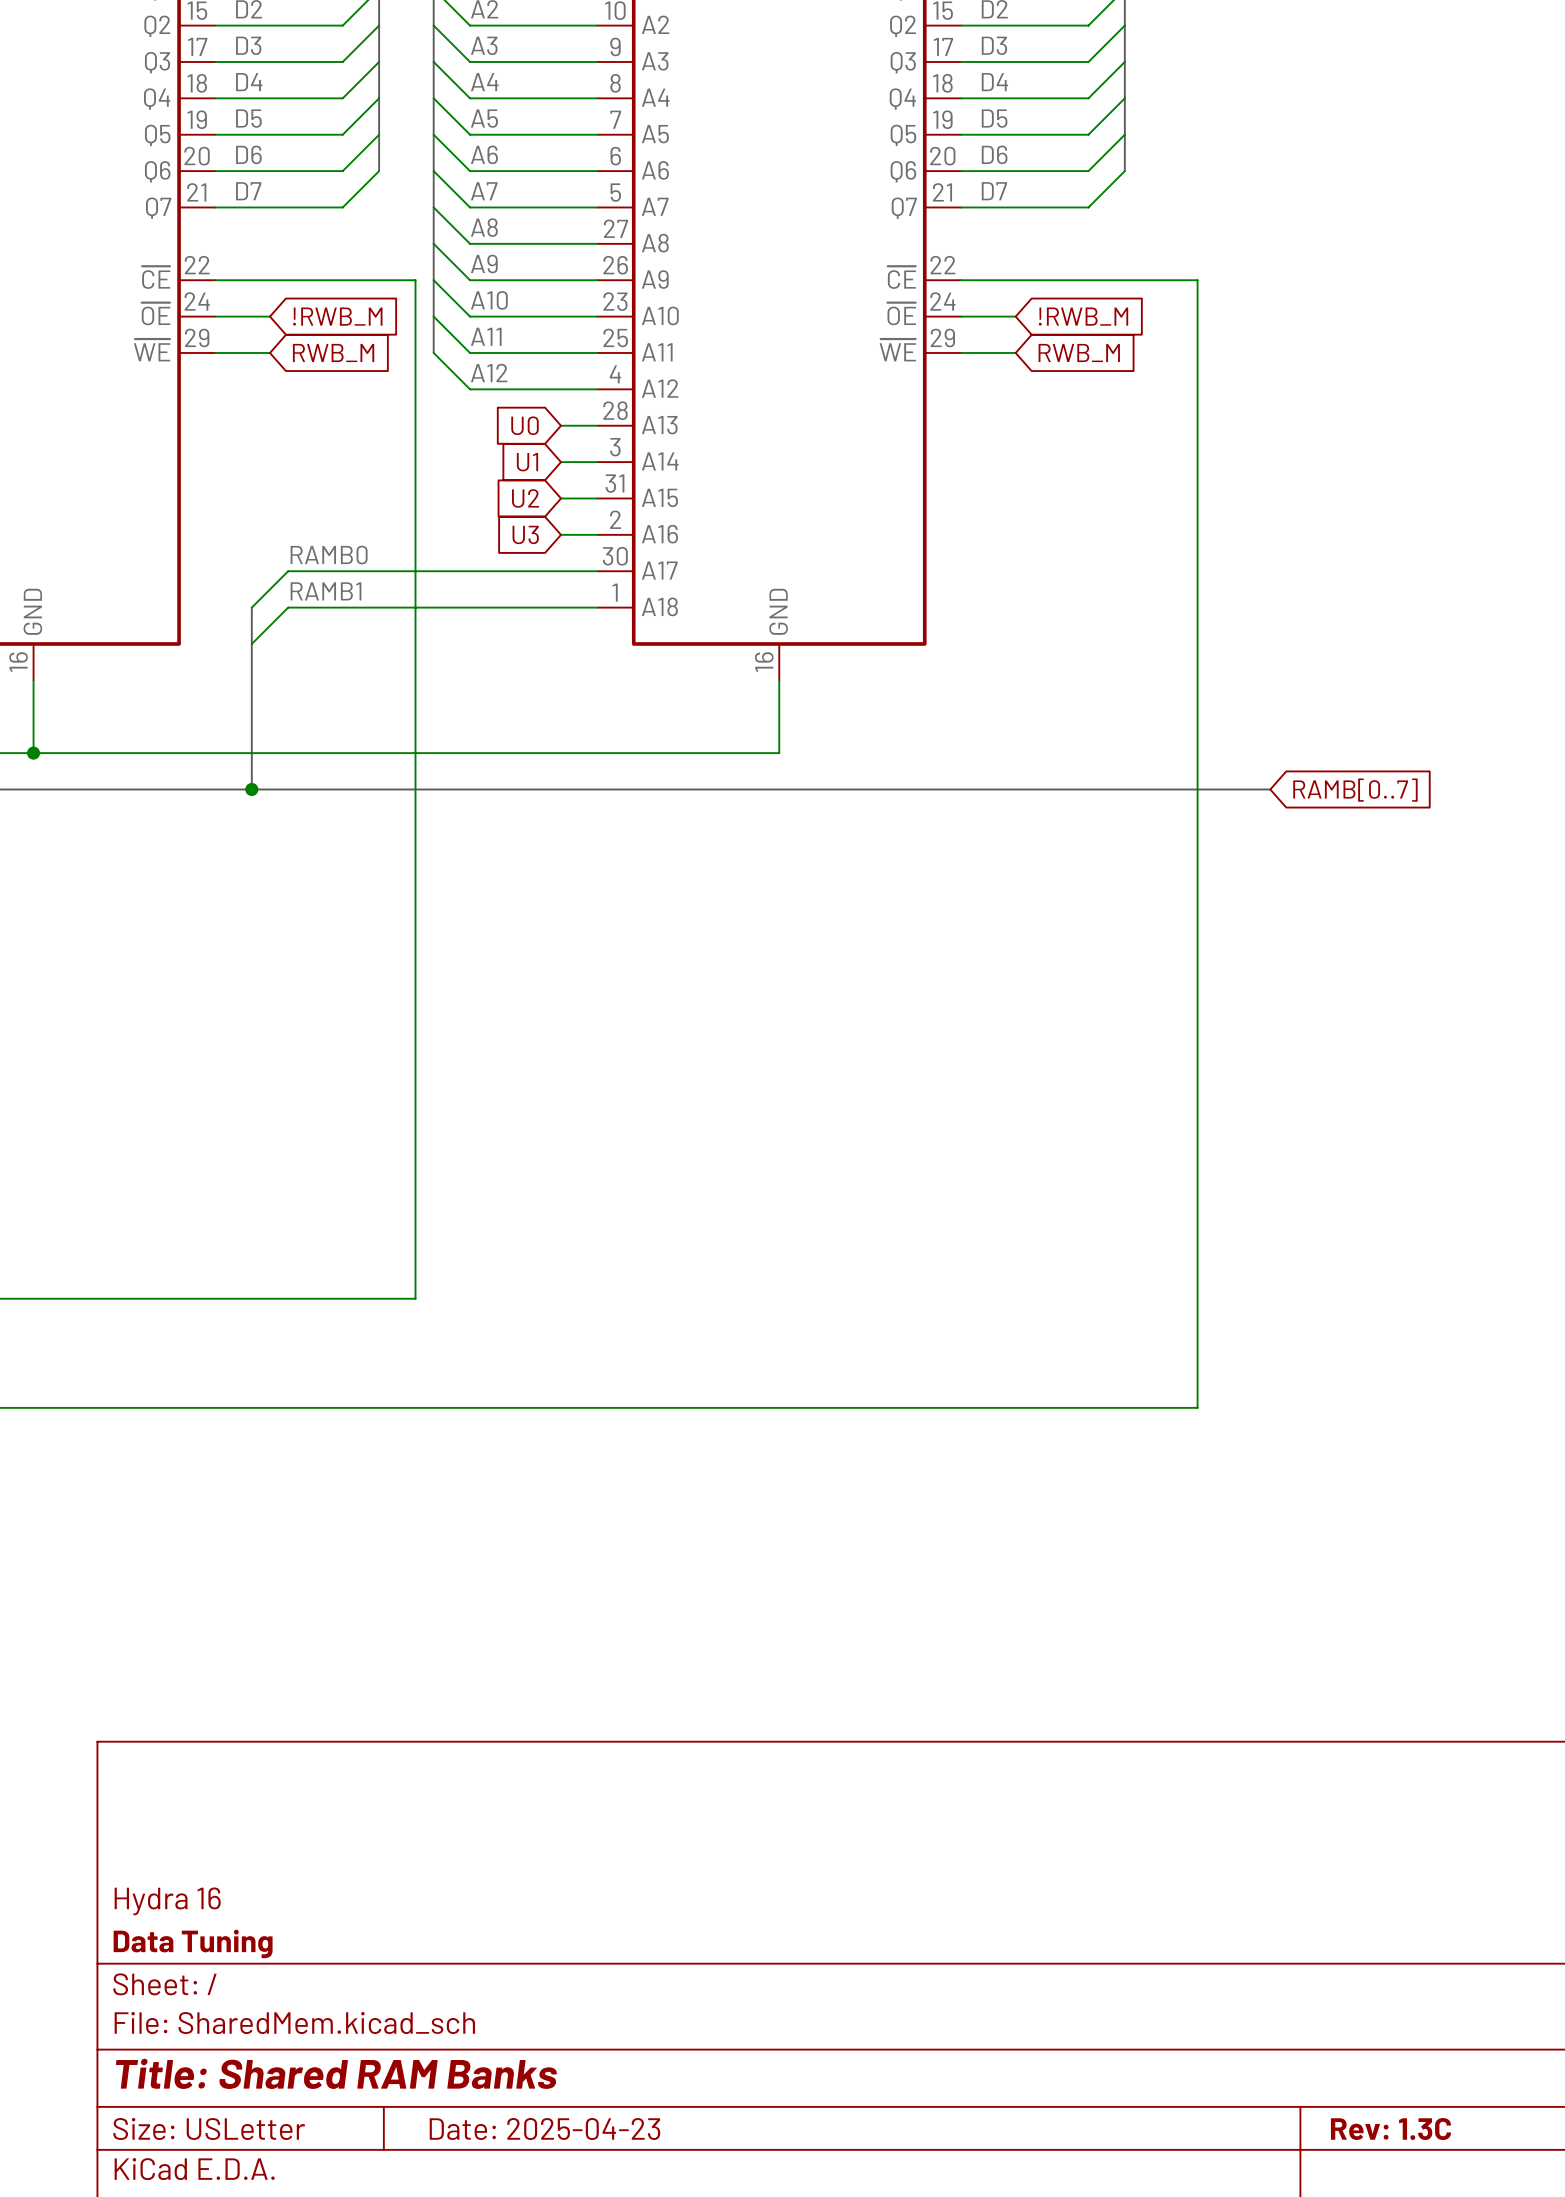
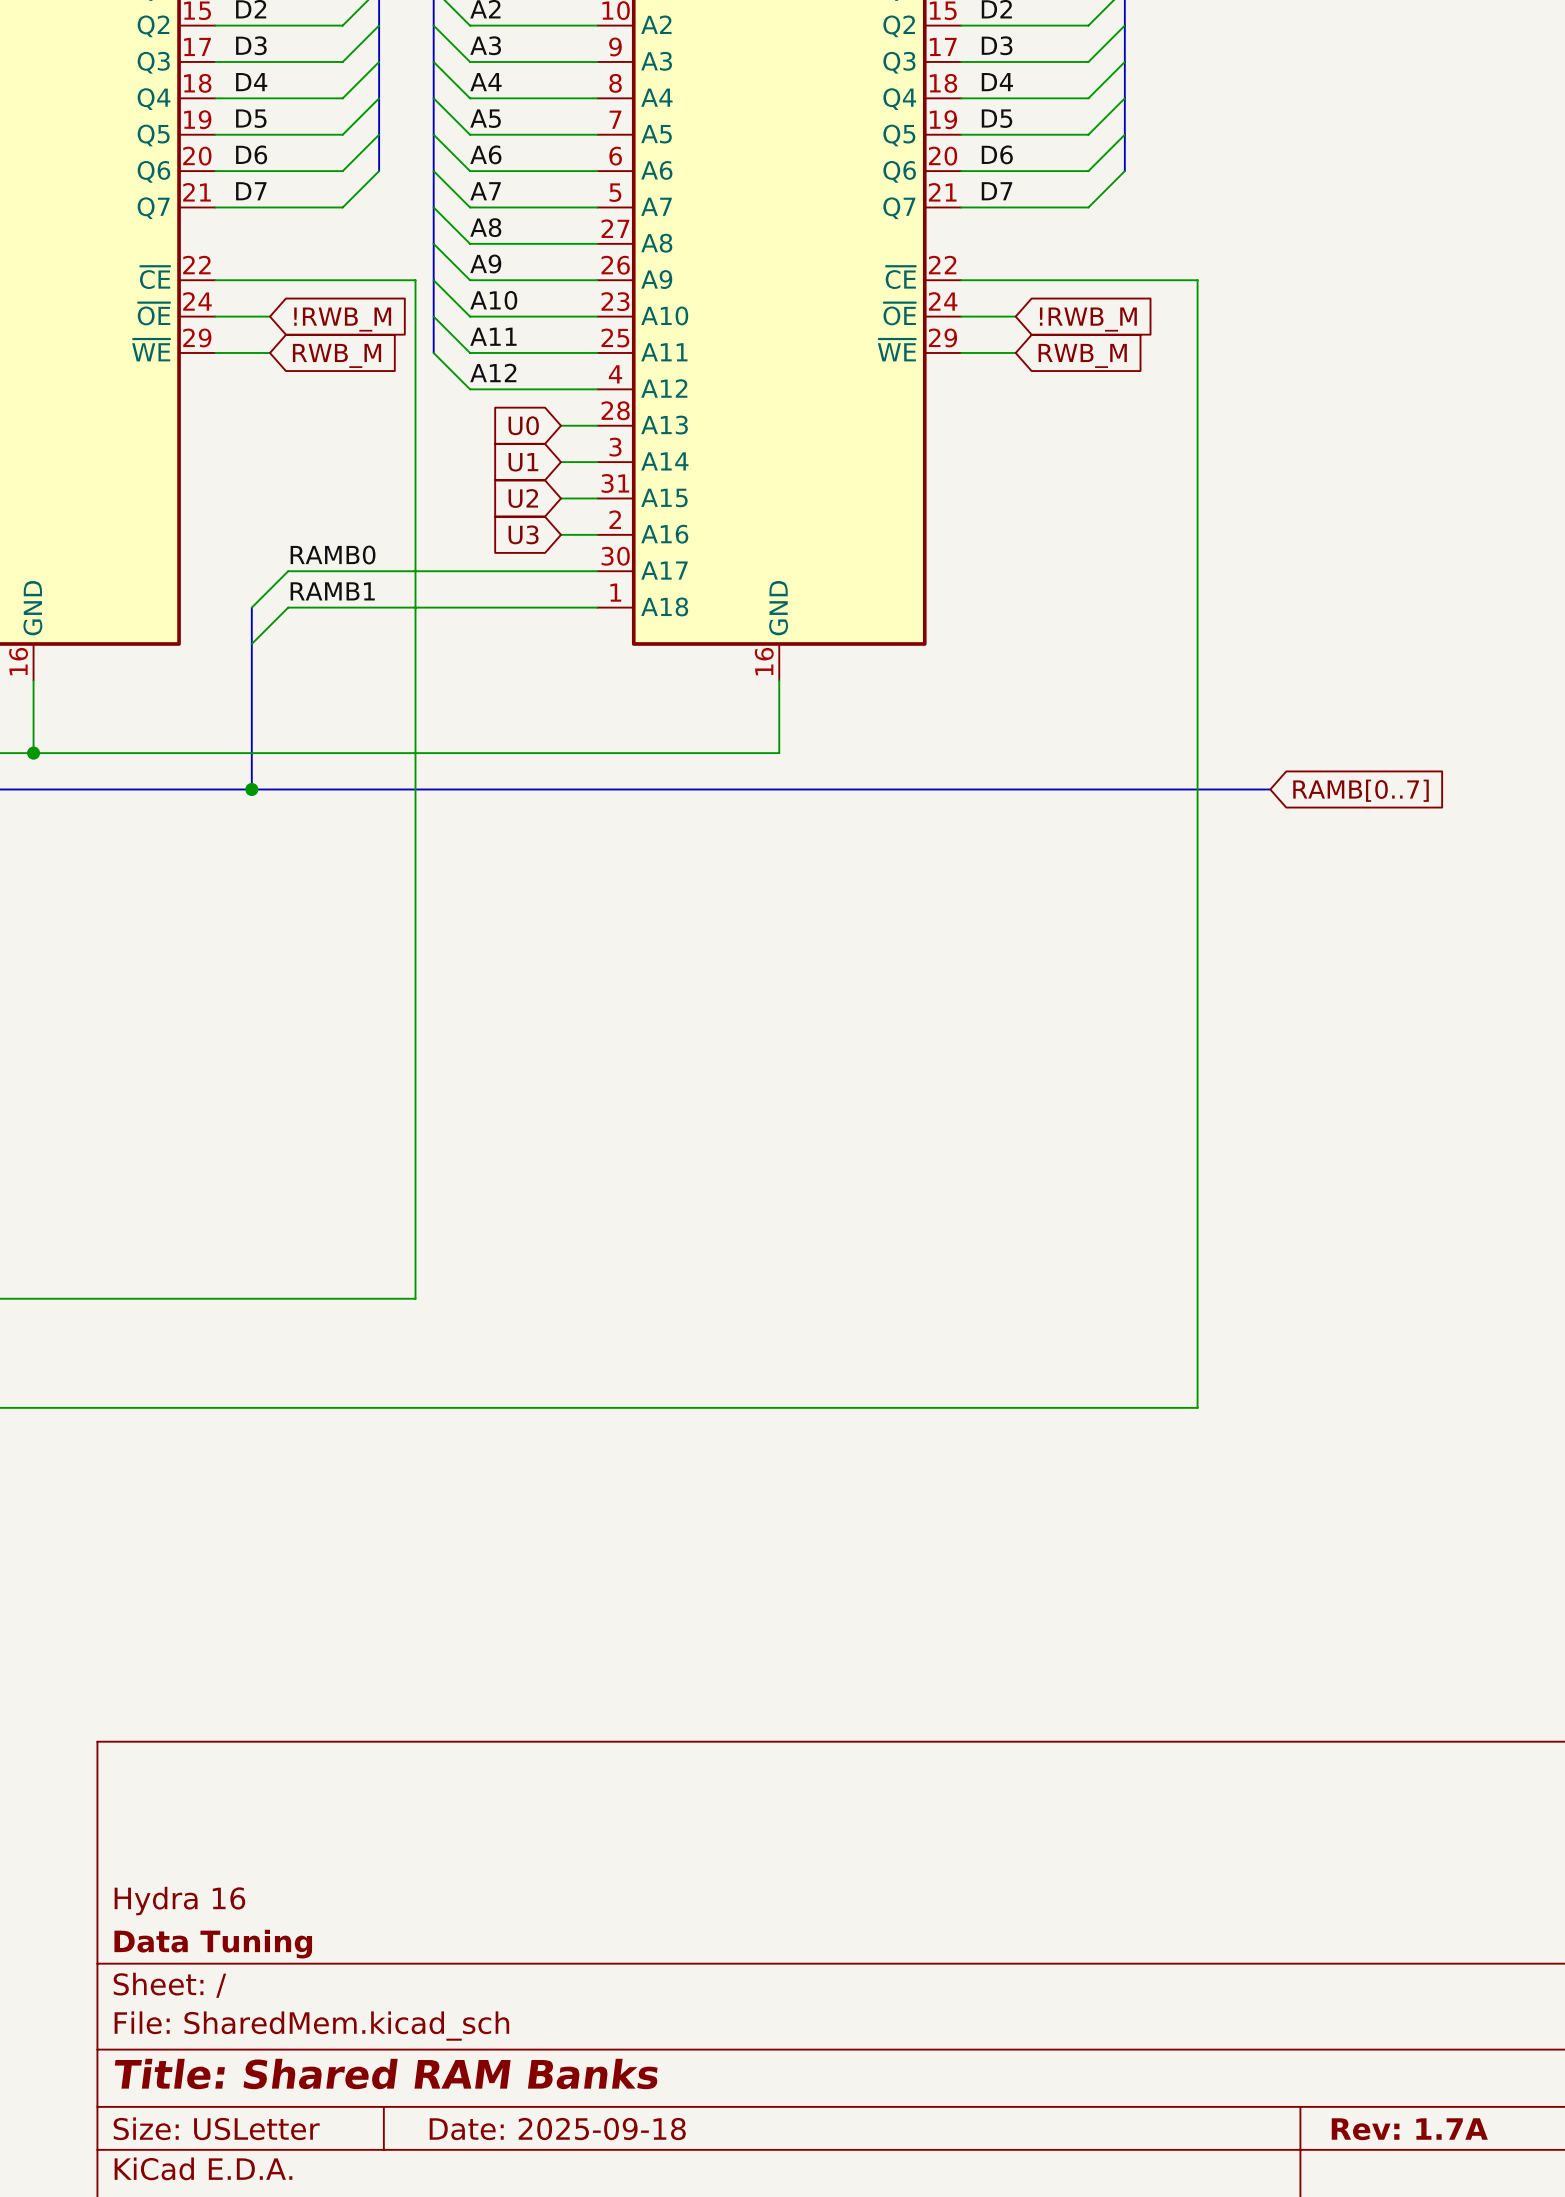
title block: Date: 2025-04-23 (544, 2129) -> Date: 2025-09-18 (557, 2129)
title block: Rev: 1.3C (1390, 2129) -> Rev: 1.7A (1409, 2129)

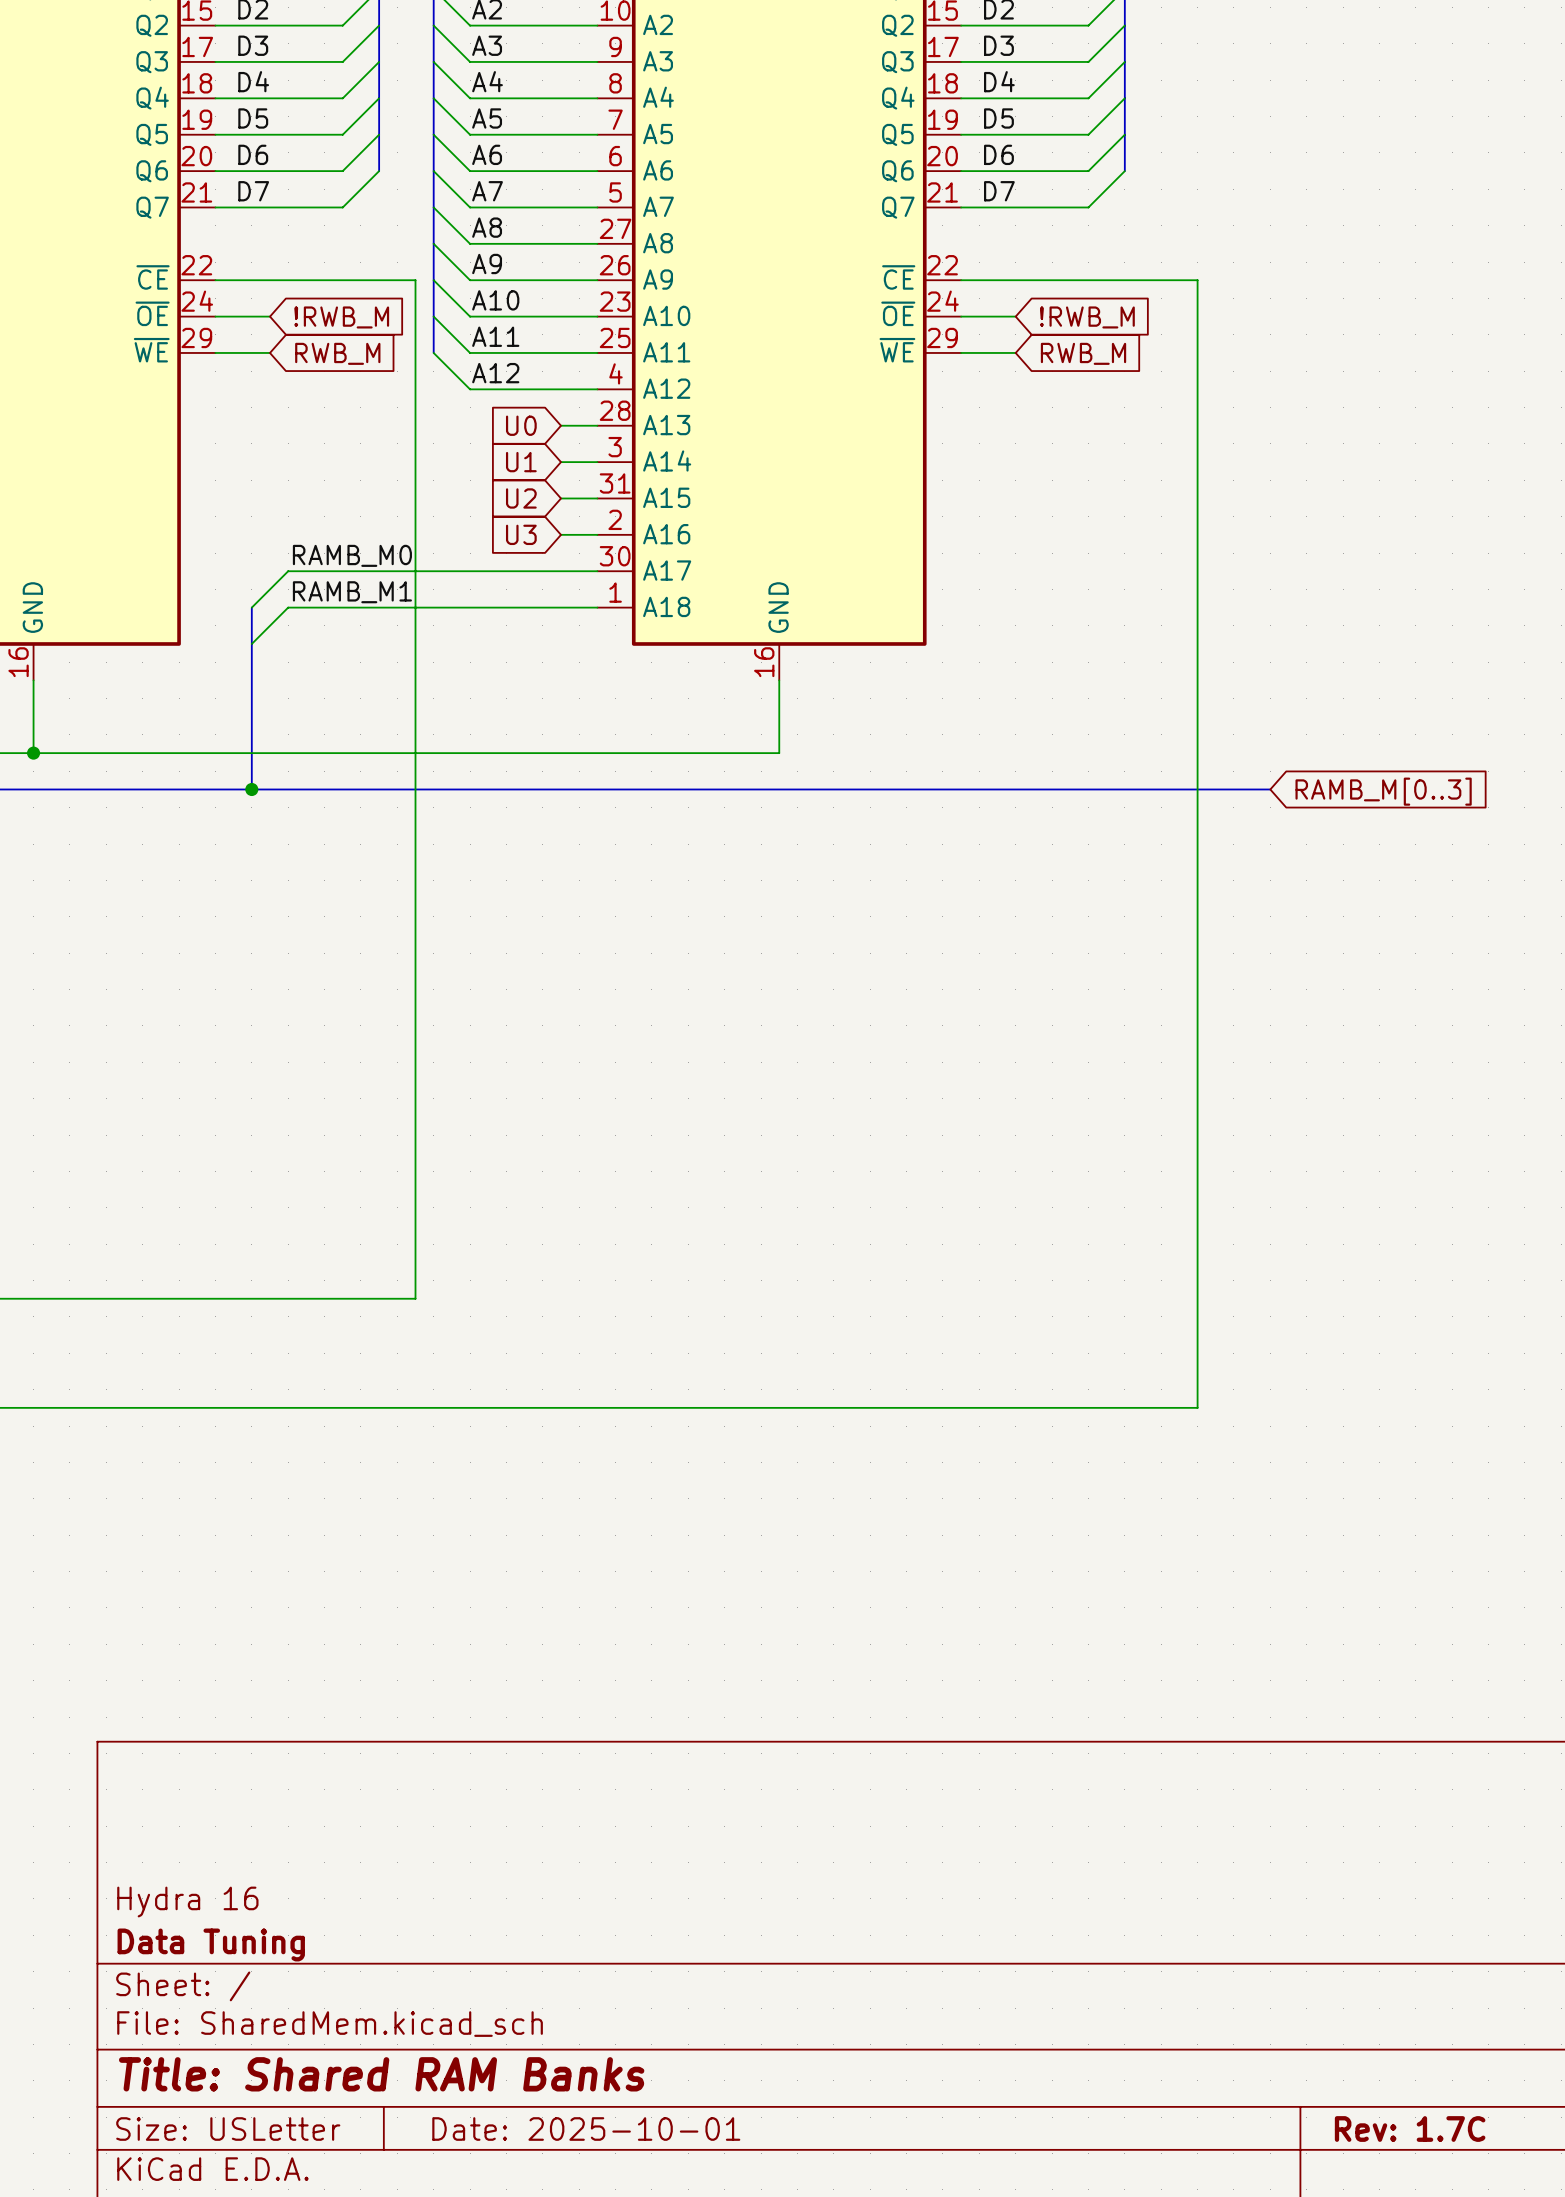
label: RAMB0 (333, 555) -> RAMB_M0 (352, 555)
label: RAMB1 (332, 591) -> RAMB_M1 (352, 592)
global label: RAMB[0..7] (1361, 790) -> RAMB_M[0..3] (1383, 791)
title block: Date: 2025-09-18 (557, 2129) -> Date: 2025-10-01 (586, 2129)
title block: Rev: 1.7A (1409, 2129) -> Rev: 1.7C (1410, 2129)

